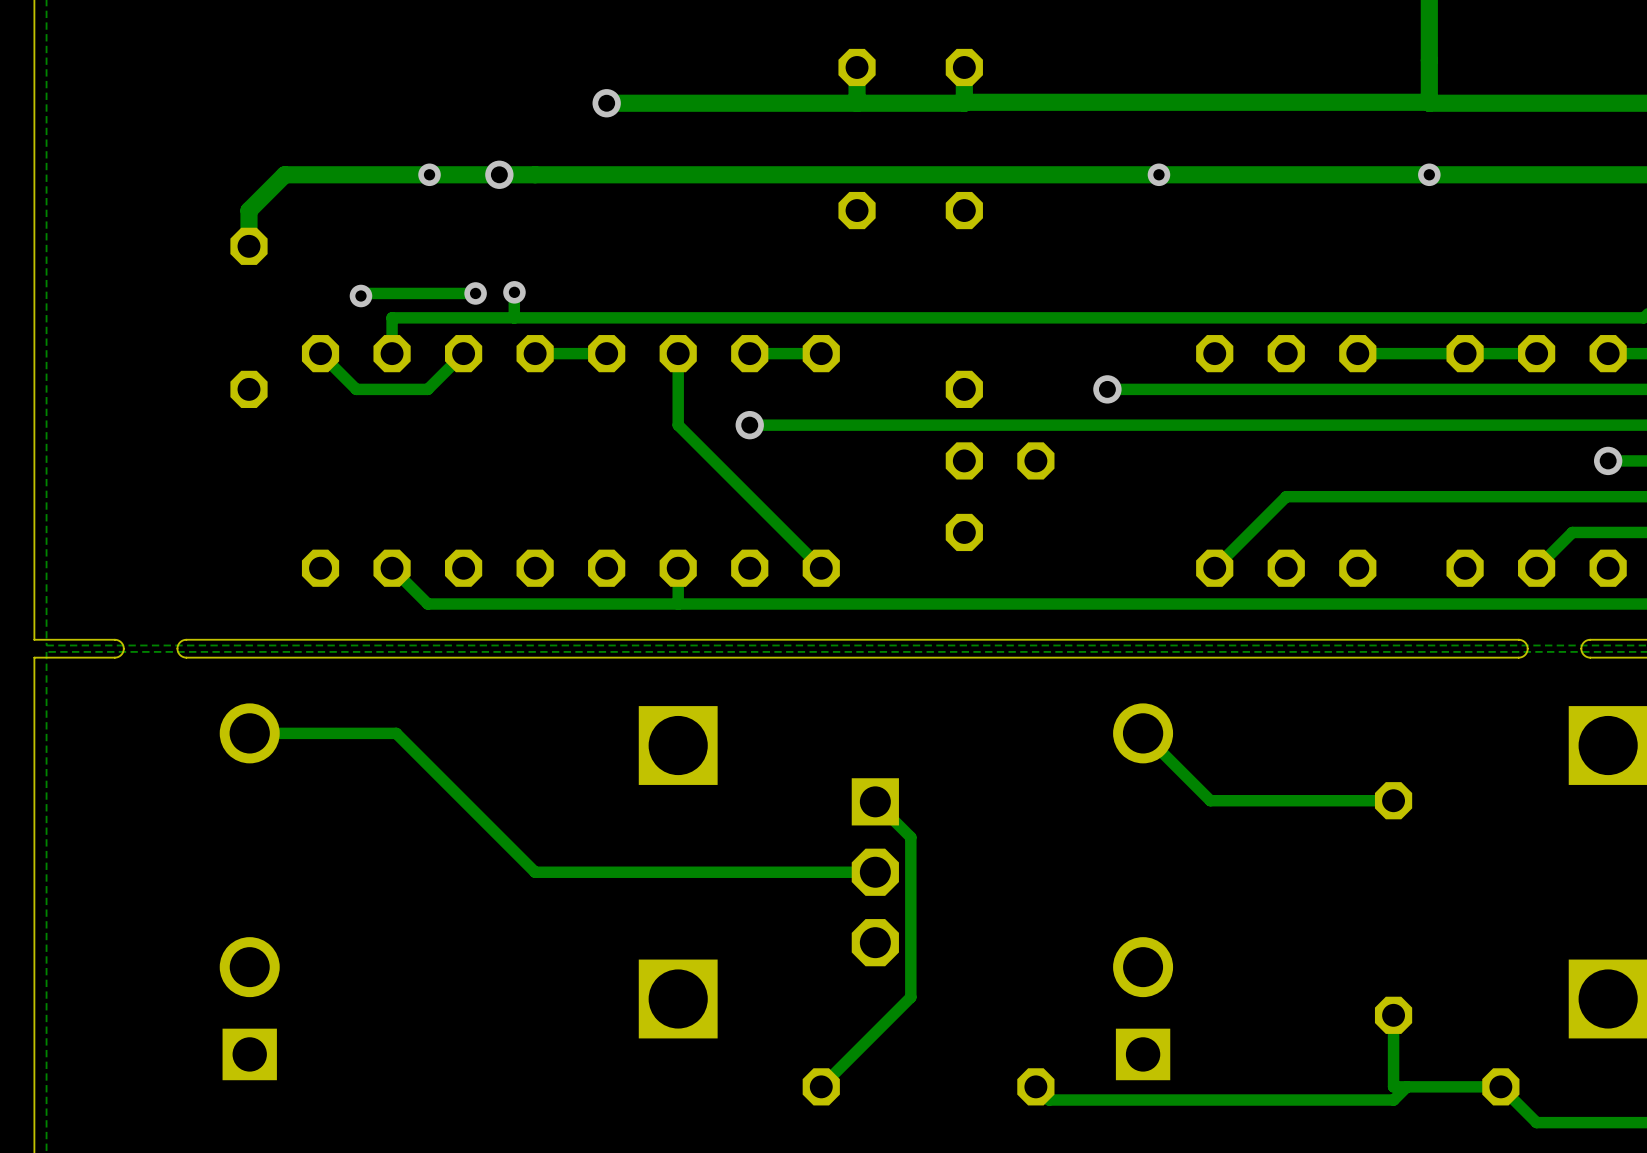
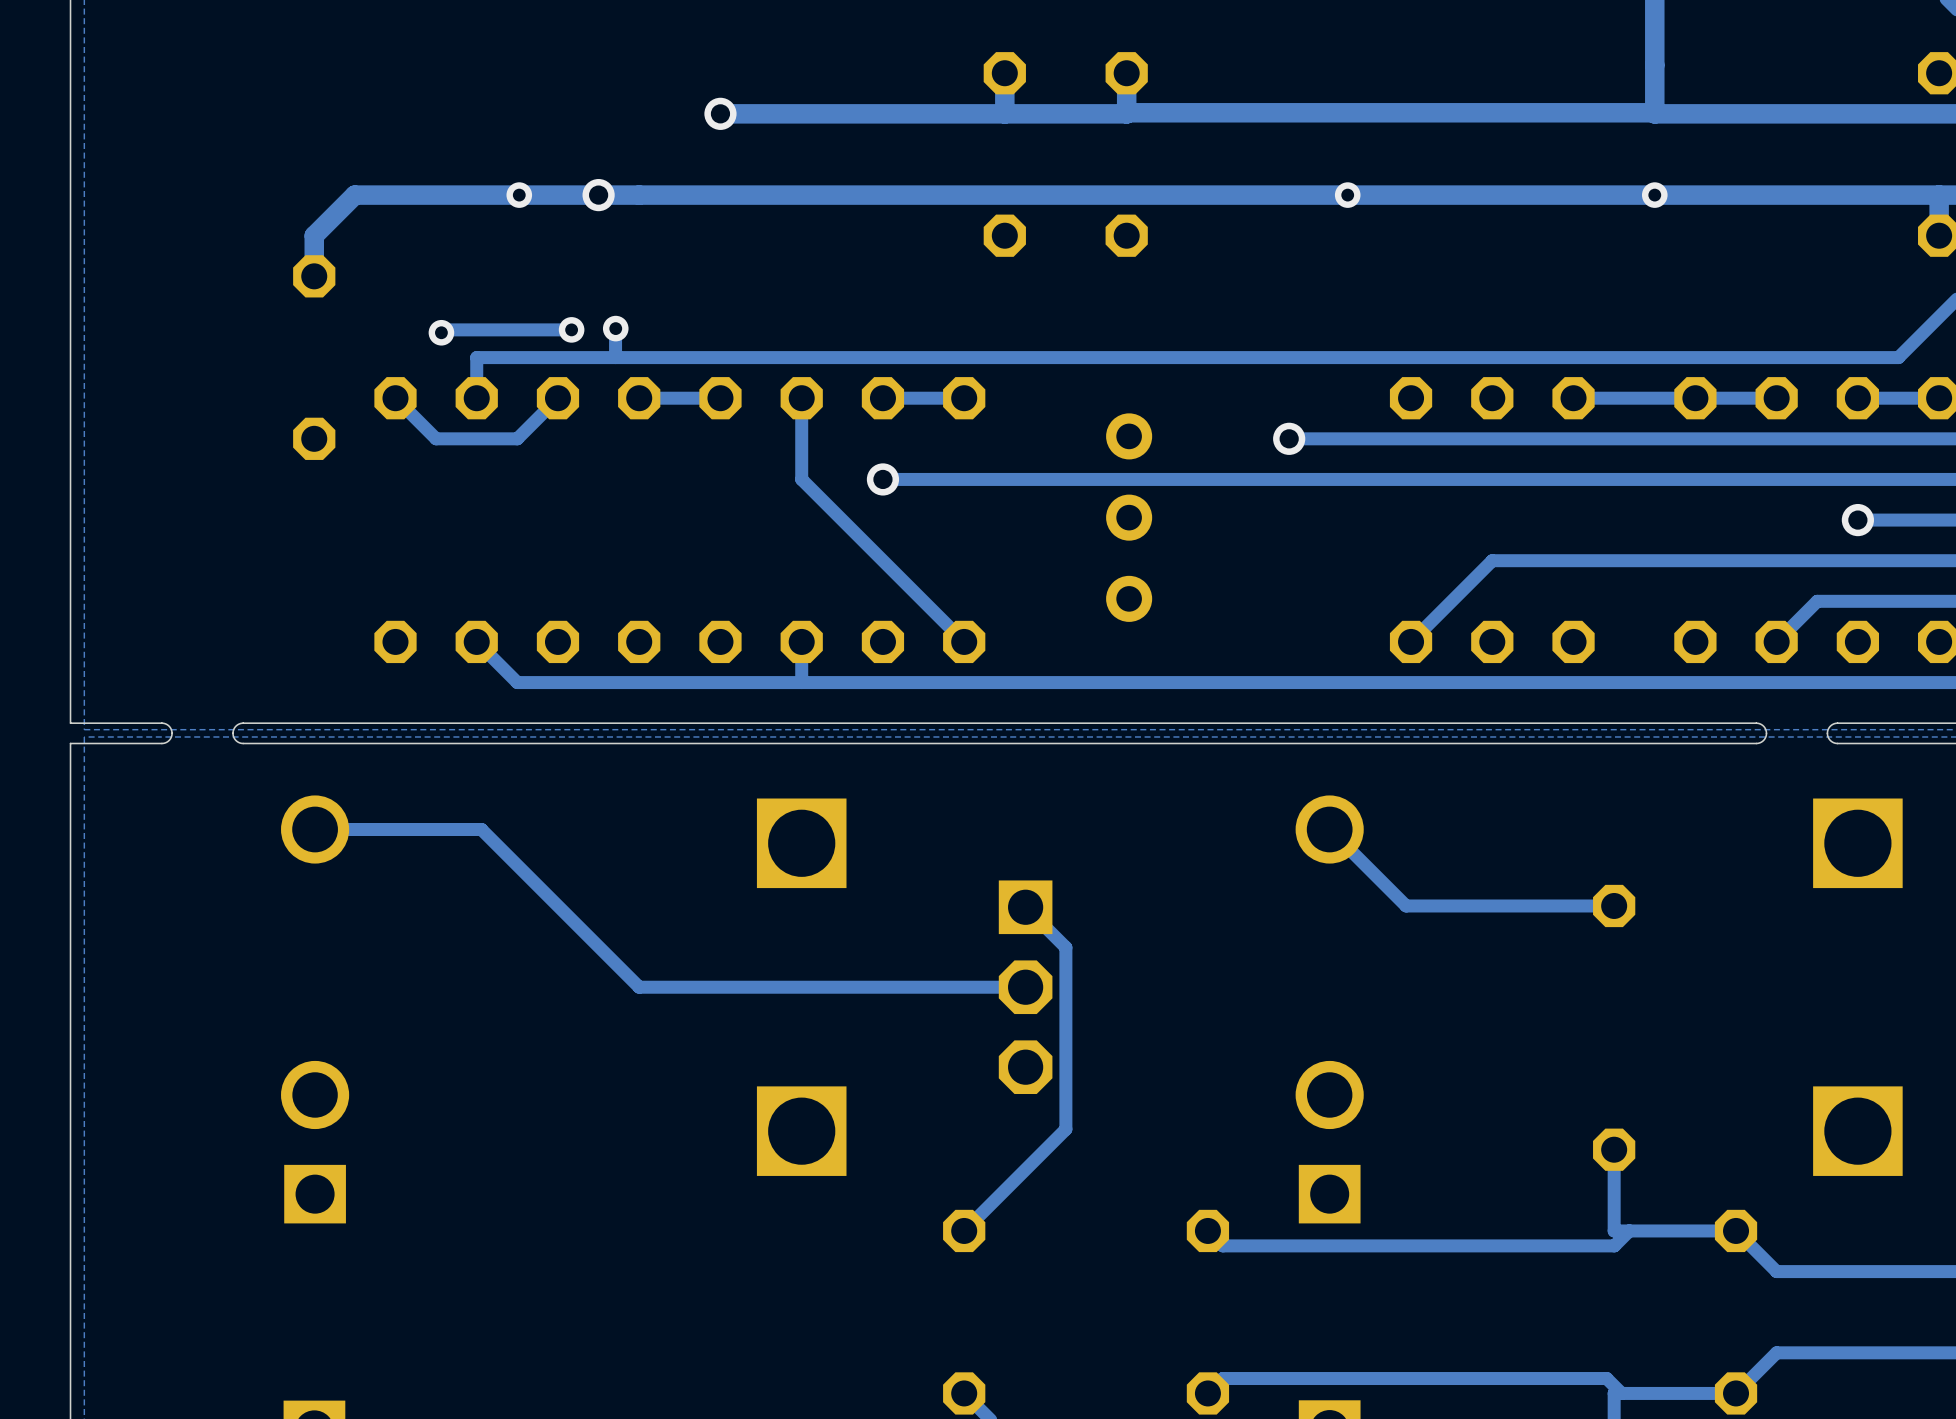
part: none -> (1129, 517)
part: (1000, 460) -> none

